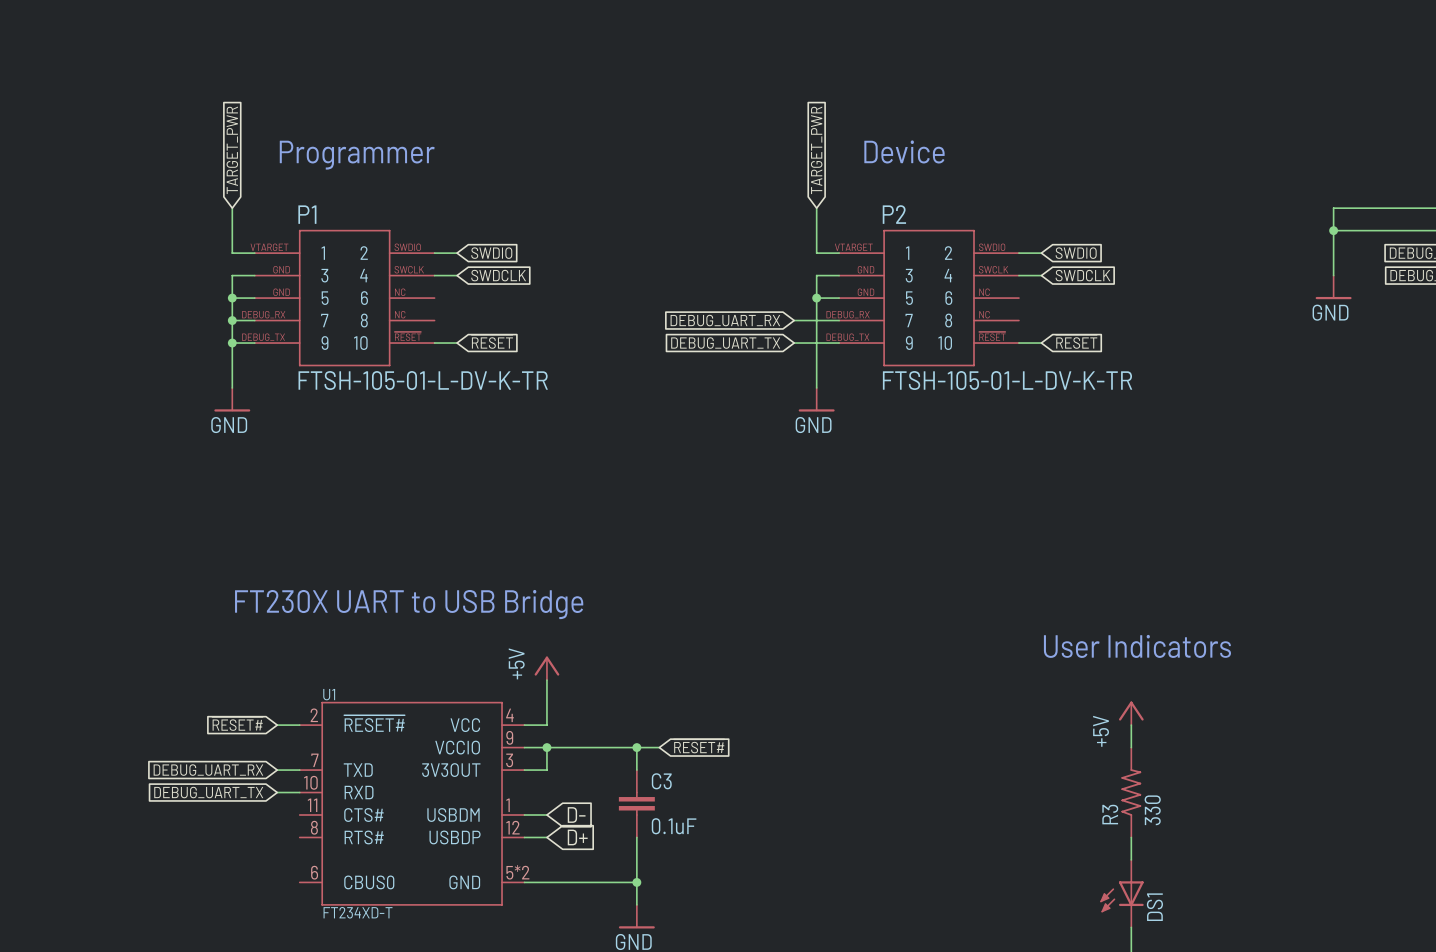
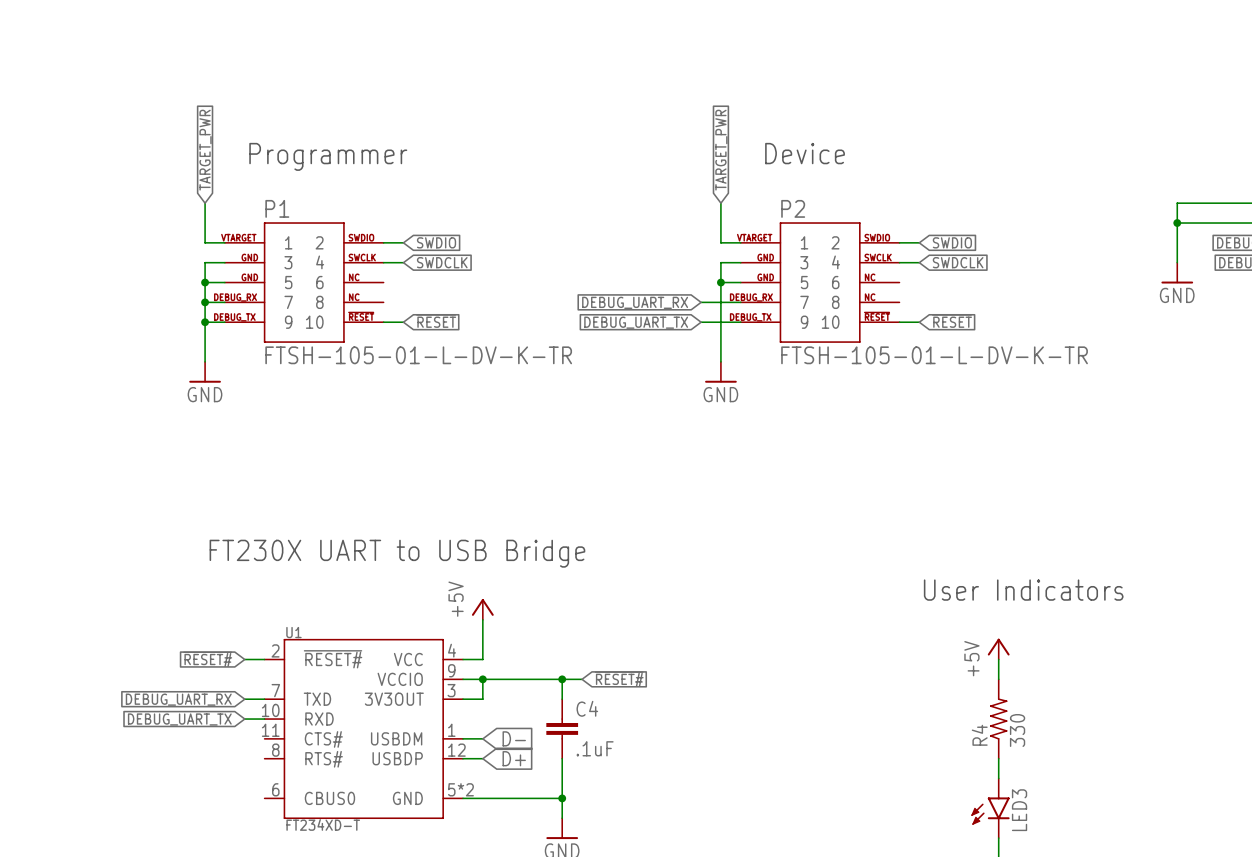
C3 name: C3 (661, 781) -> C4 (587, 708)
R3 name: R3 (1110, 814) -> R4 (979, 735)
C3 value: 0.1uF (674, 826) -> .1uF (595, 748)
DS1: (1122, 893) -> none
LED3: none -> (990, 808)

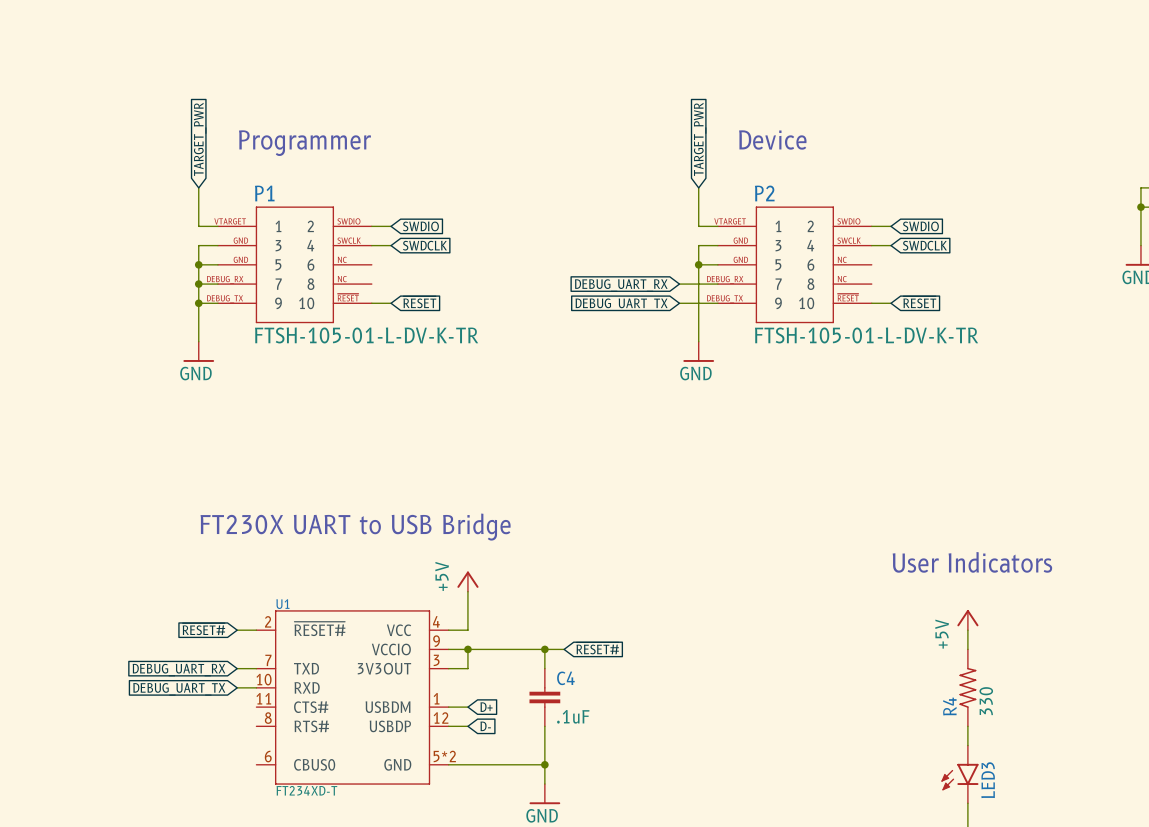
global label: D- (514, 738) -> D+ (486, 707)
global label: D+ (514, 758) -> D- (485, 726)

